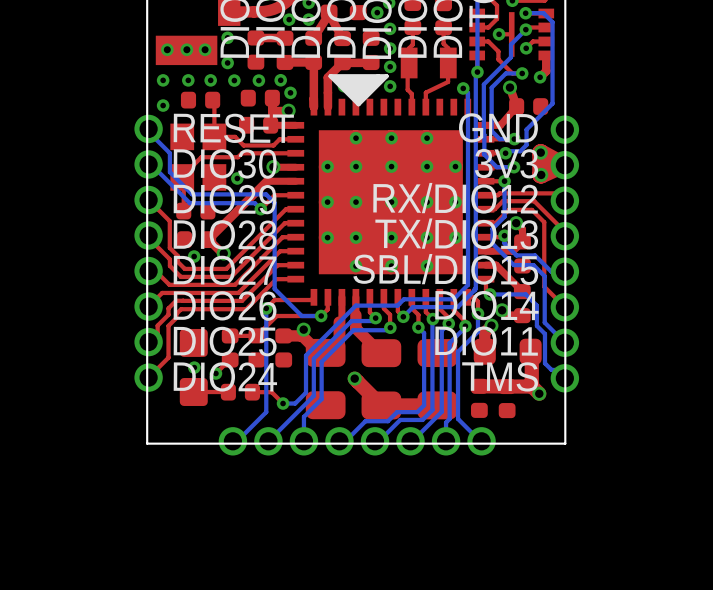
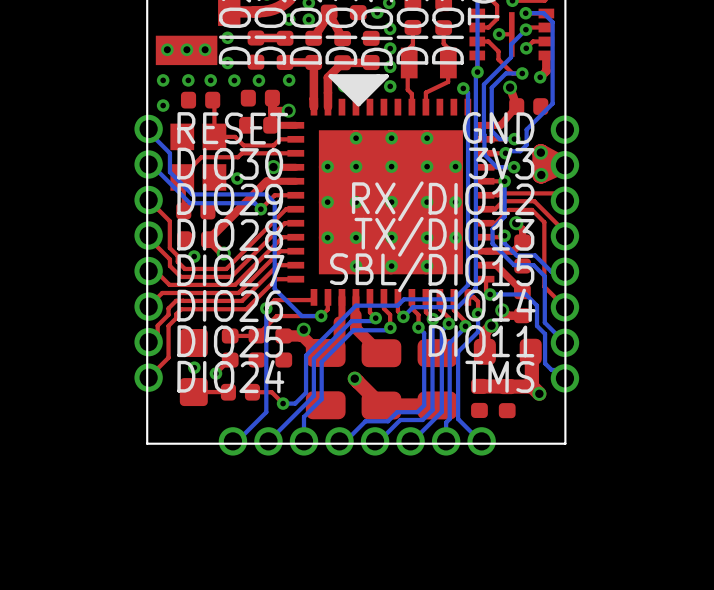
via: (280, 80) -> none
via: none -> (289, 80)
via: (290, 92) -> none

